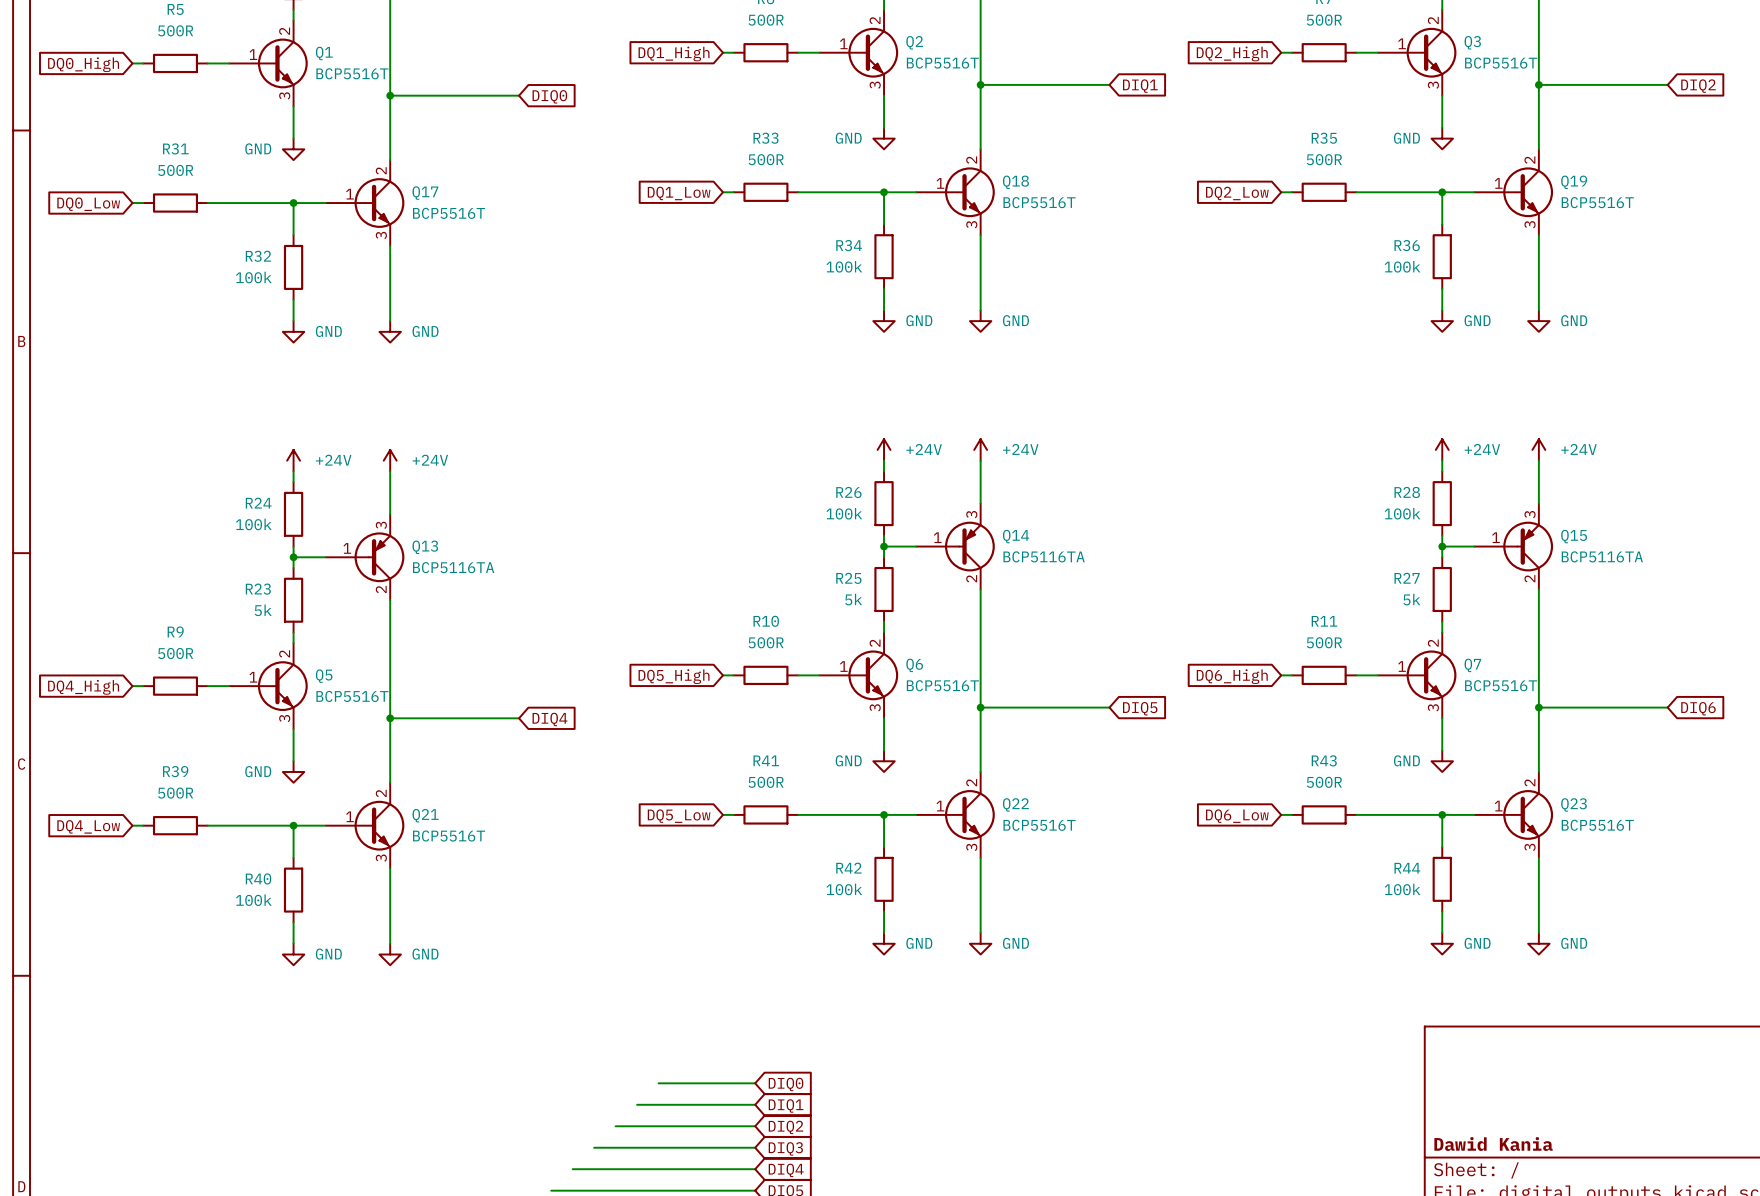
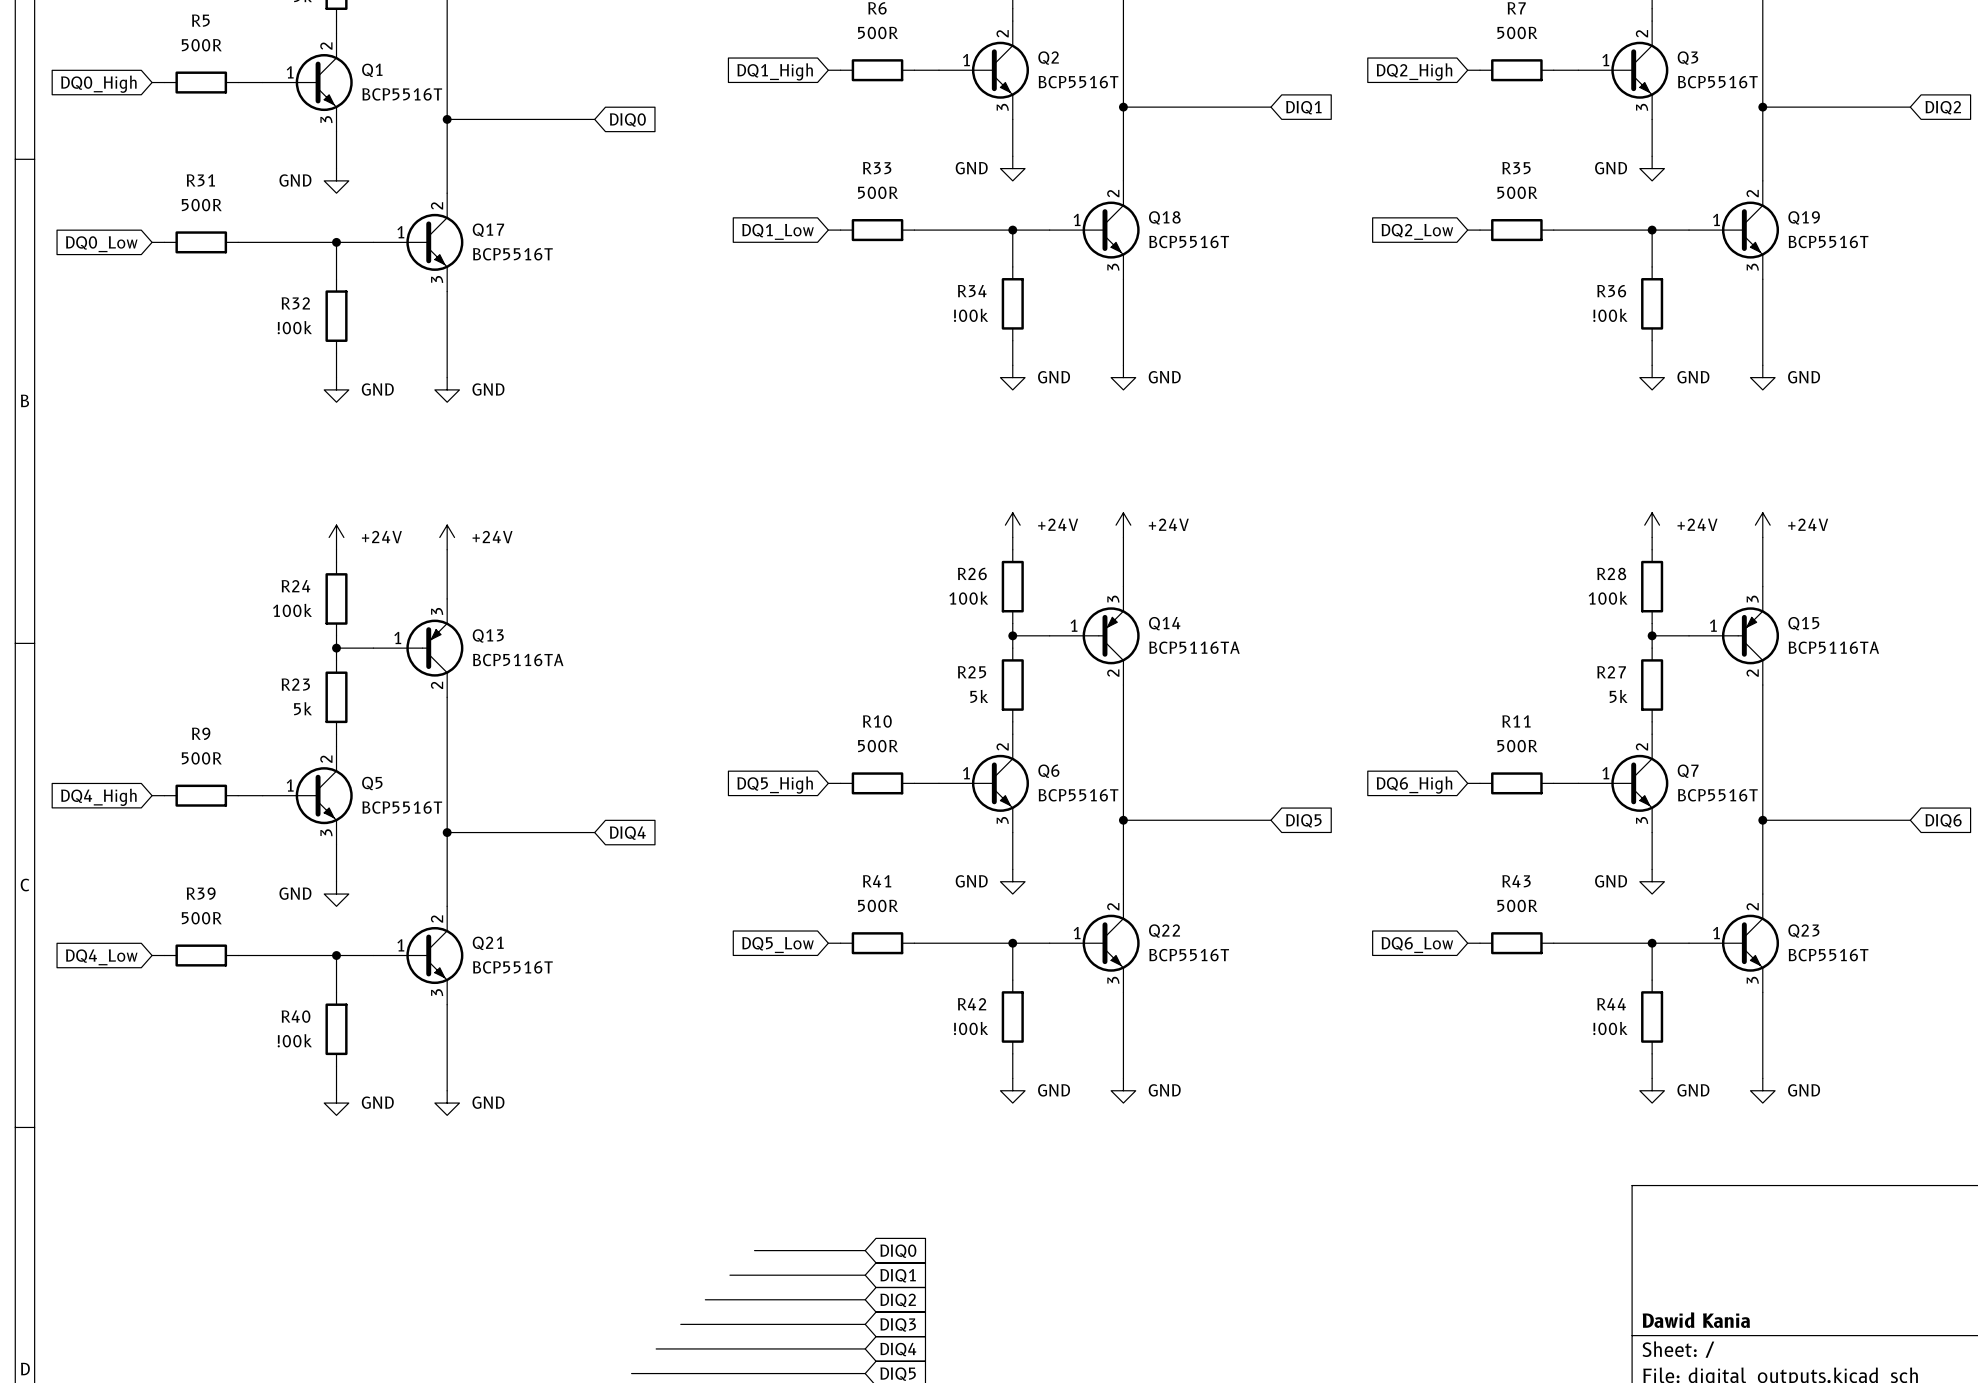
R34 value: 100k (844, 266) -> !00k (971, 315)
R36 value: 100k (1402, 266) -> !00k (1610, 315)
R32 value: 100k (253, 277) -> !00k (294, 327)
R42 value: 100k (844, 889) -> !00k (971, 1028)
R44 value: 100k (1402, 889) -> !00k (1610, 1028)
R40 value: 100k (253, 900) -> !00k (294, 1040)

